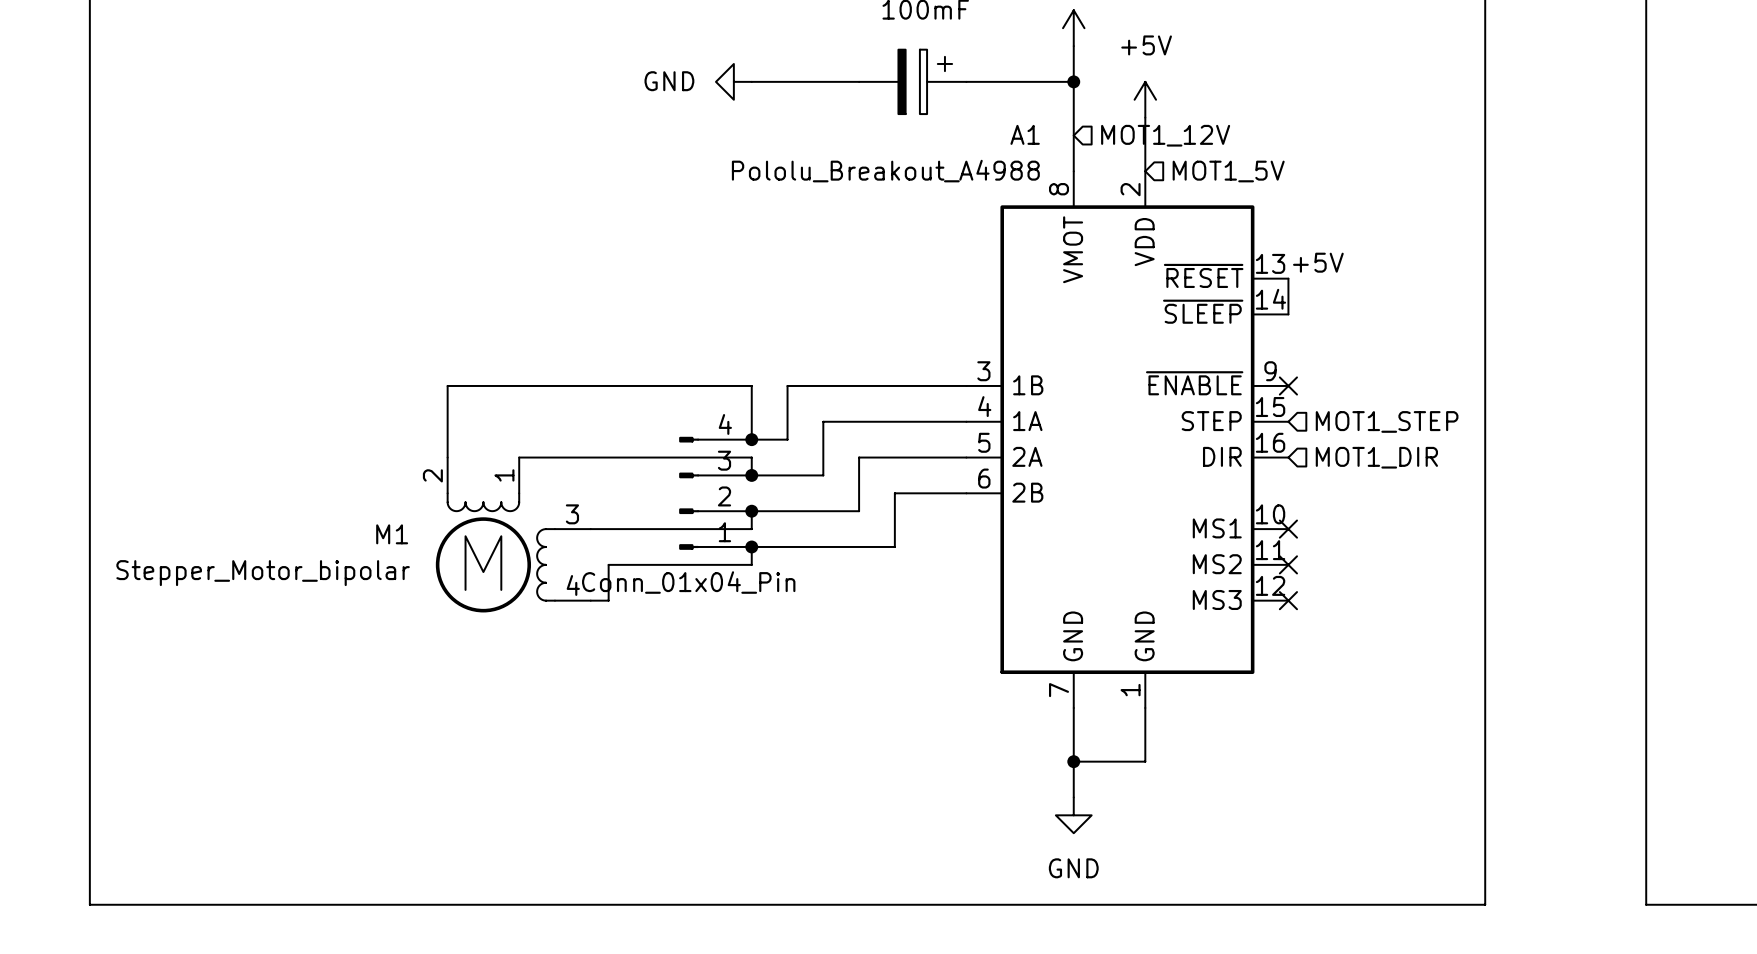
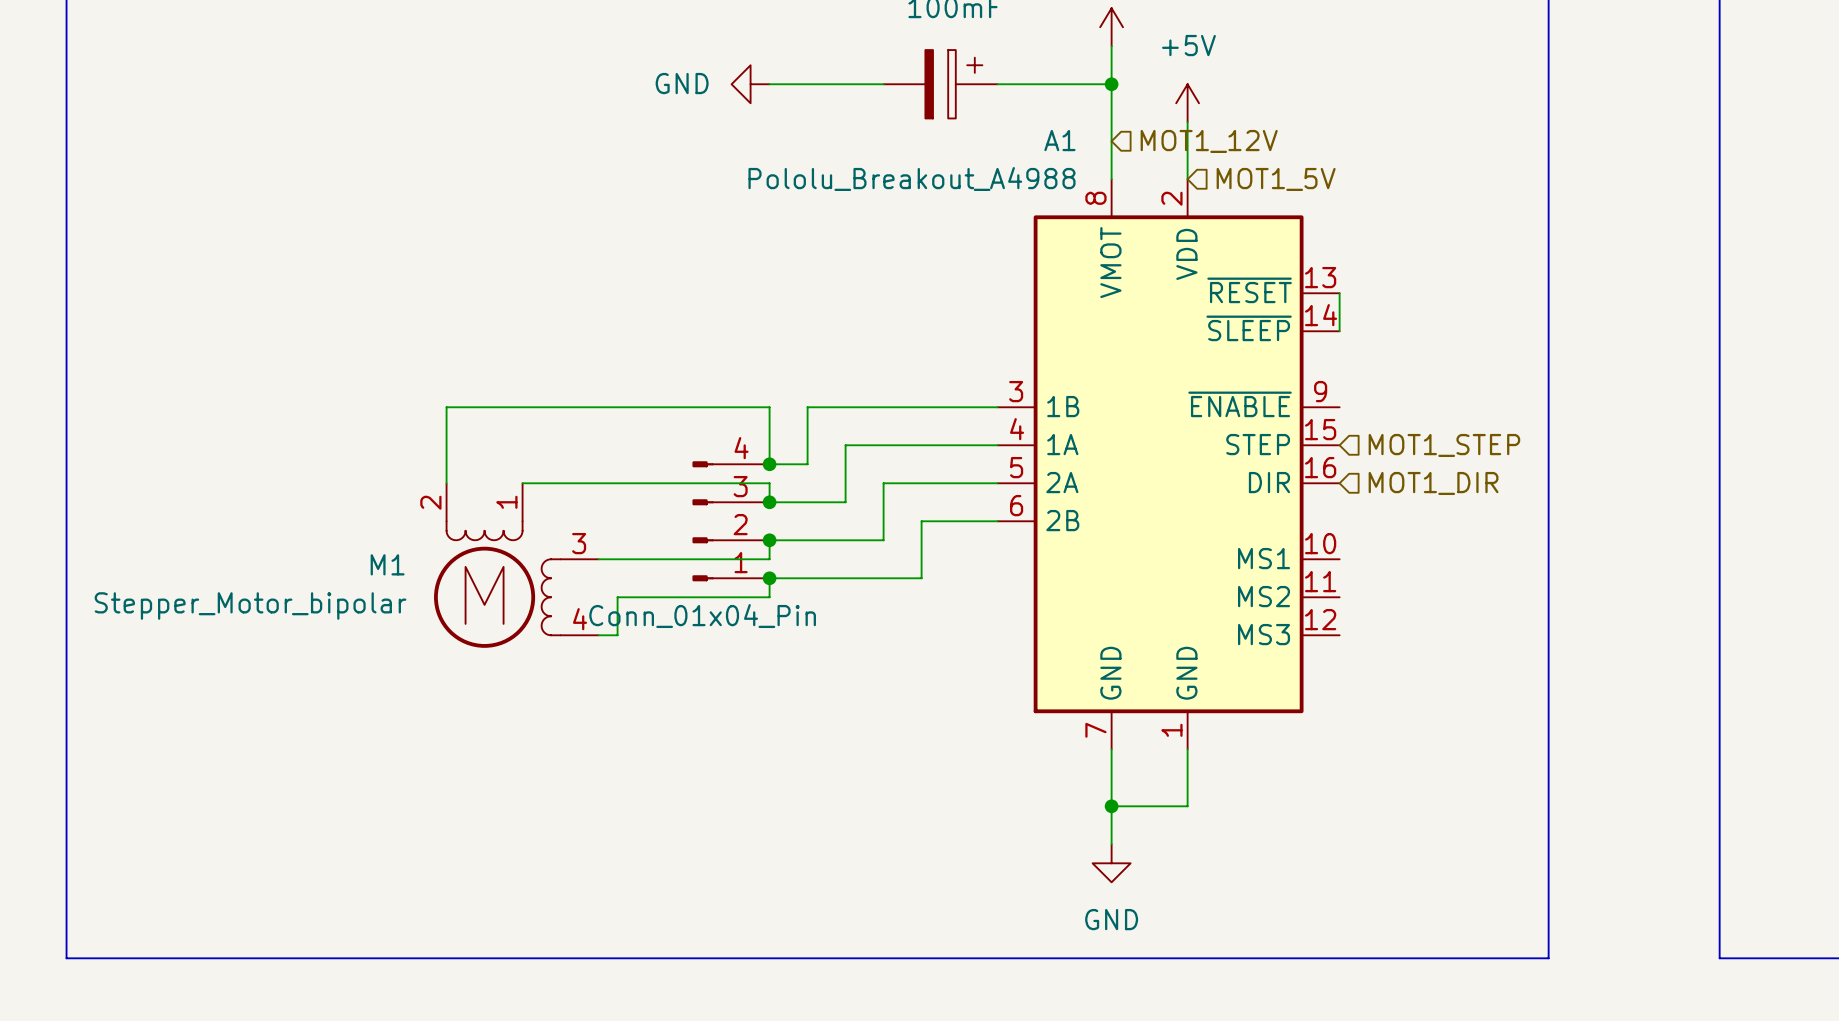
label: +5V (1318, 262) -> none
no-connect mark: (1288, 385) -> none
no-connect mark: (1288, 529) -> none
no-connect mark: (1288, 564) -> none
no-connect mark: (1288, 600) -> none

